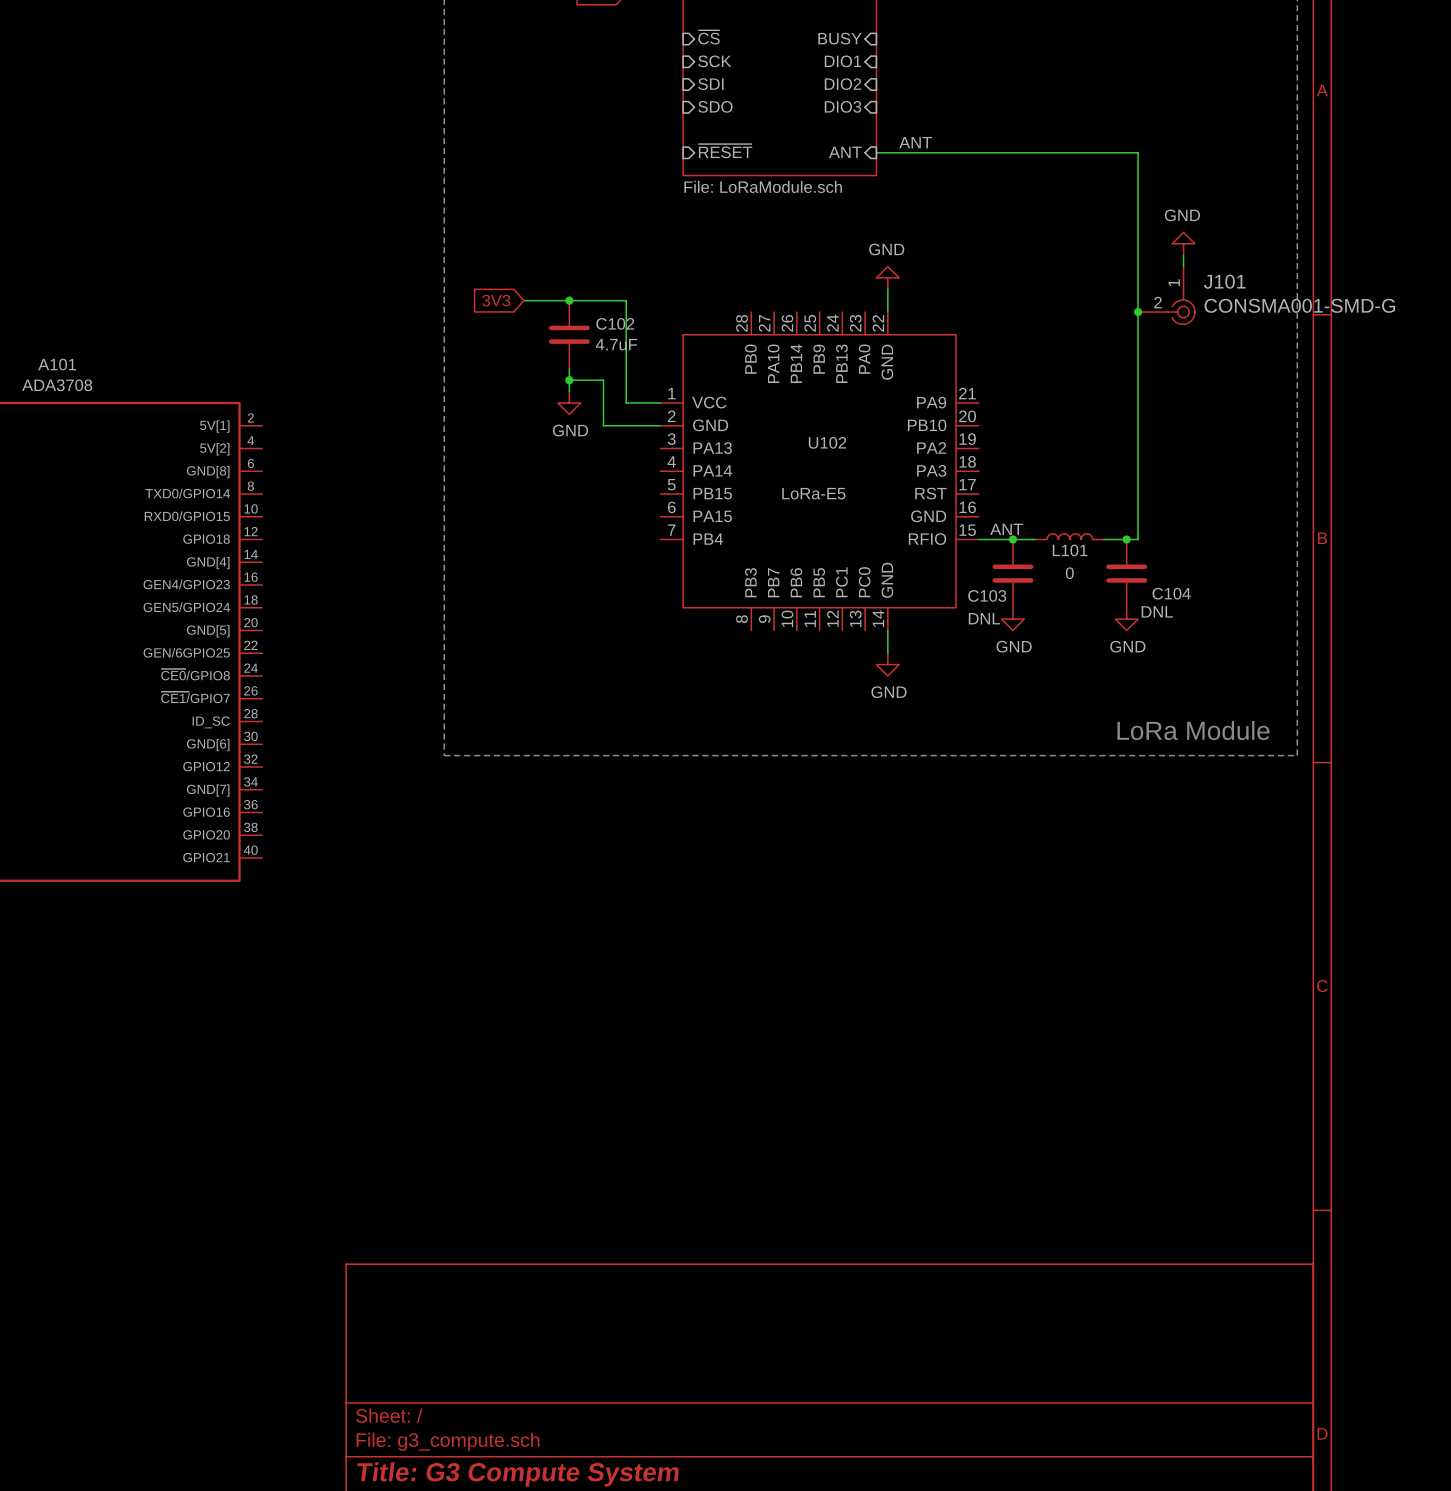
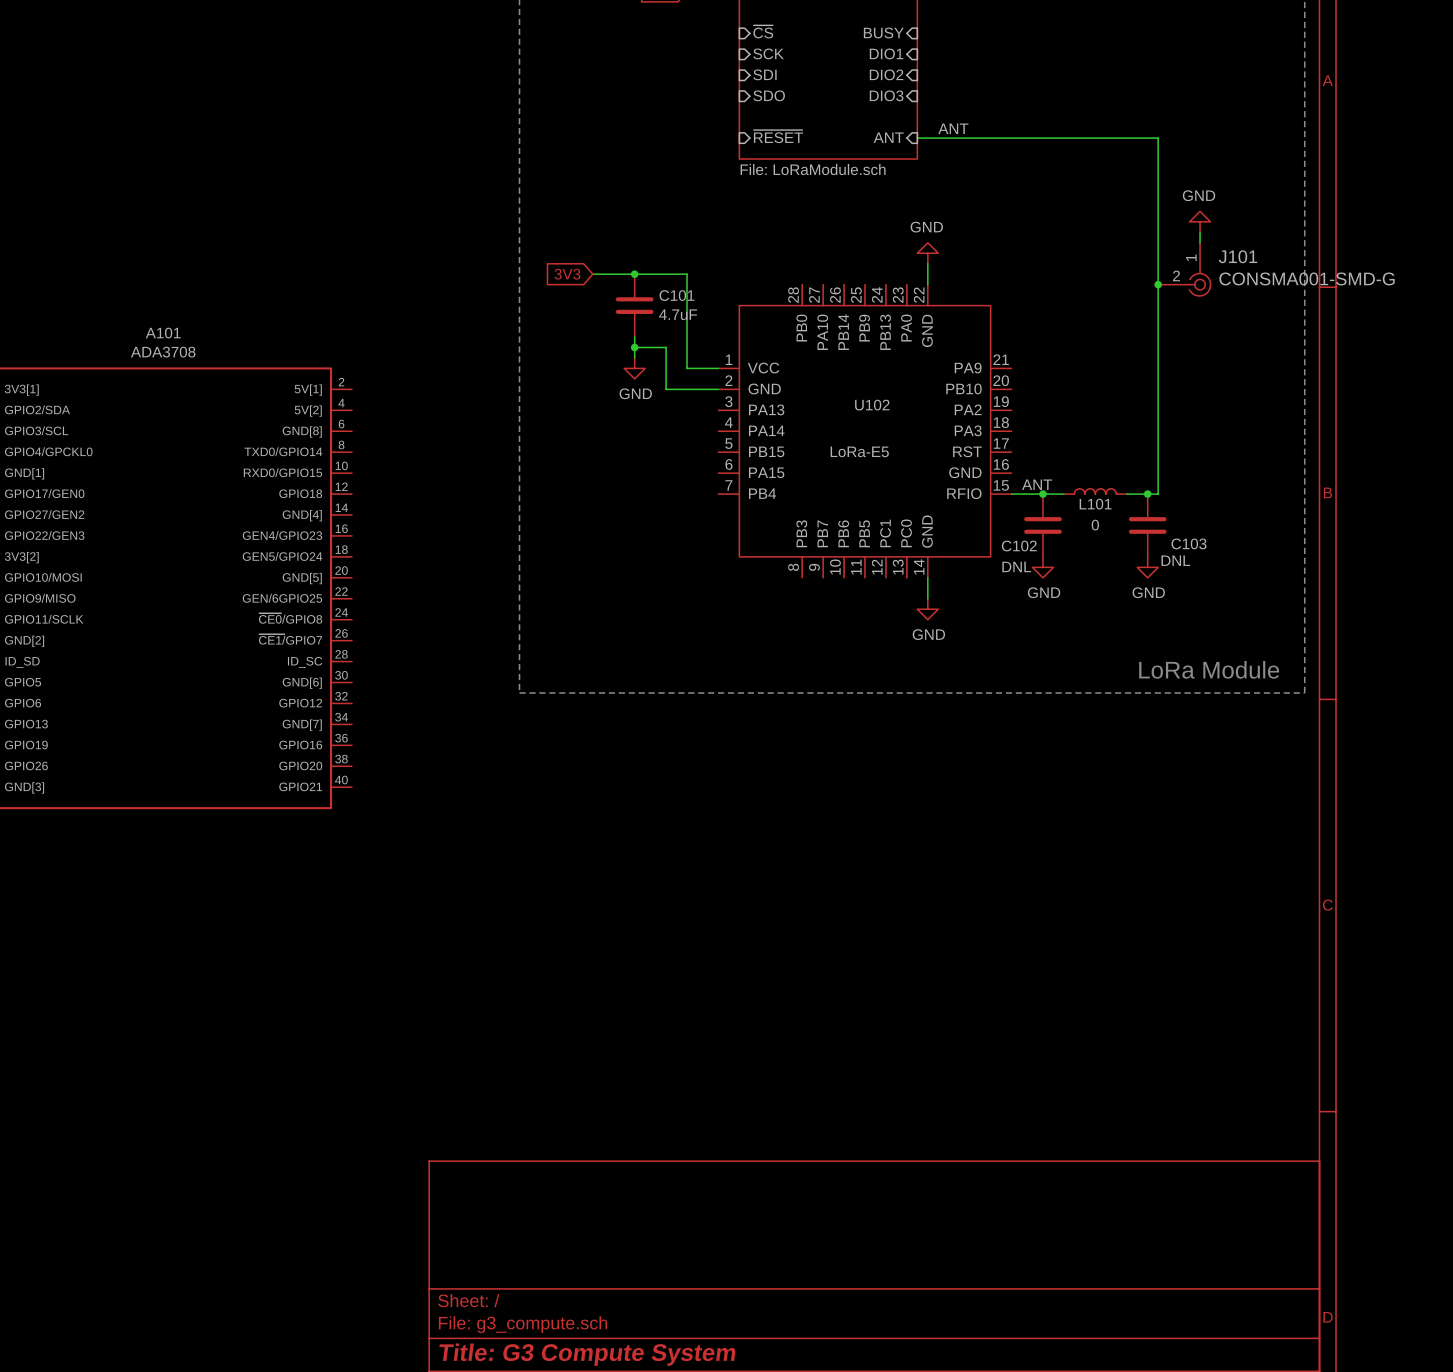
C102 name: C102 (615, 323) -> C101 (676, 295)
C104 name: C104 (1171, 593) -> C103 (1188, 543)
C103 name: C103 (987, 595) -> C102 (1019, 546)

